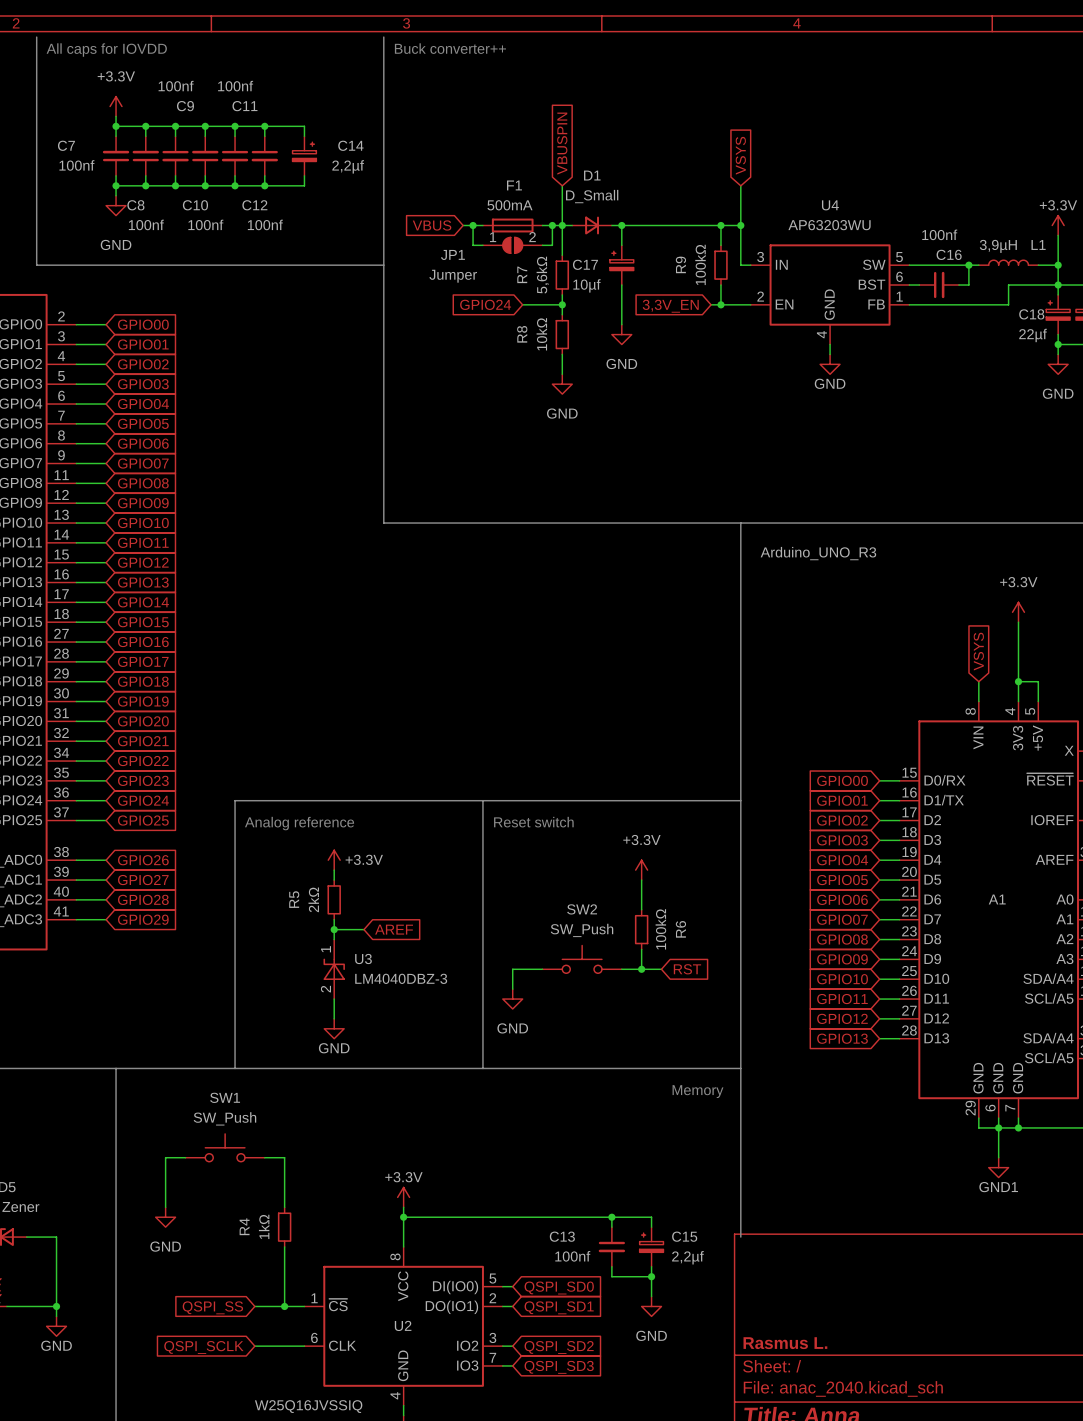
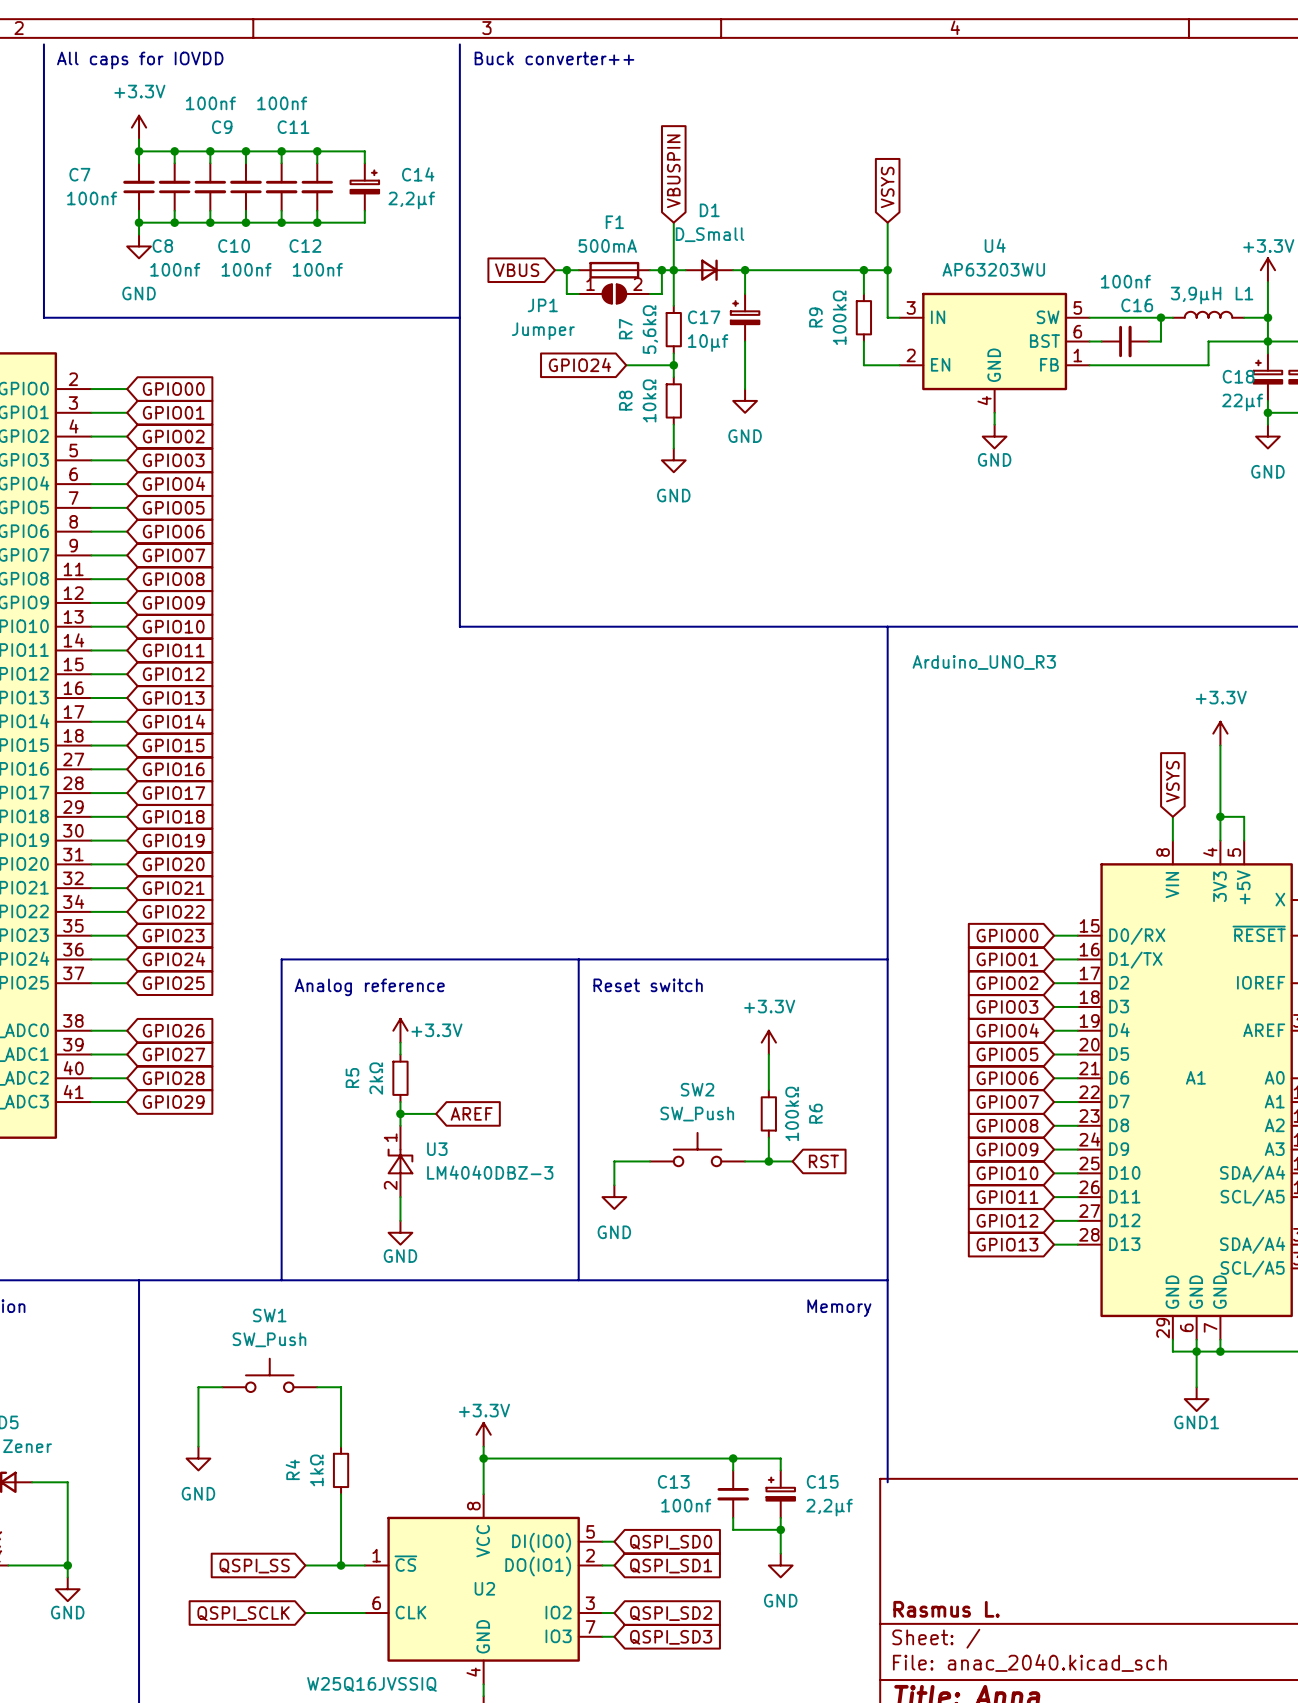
wire: (711, 304) (720, 304) -> none
junction: (720, 304) -> none
global label: 3,3V_EN (670, 306) -> none

